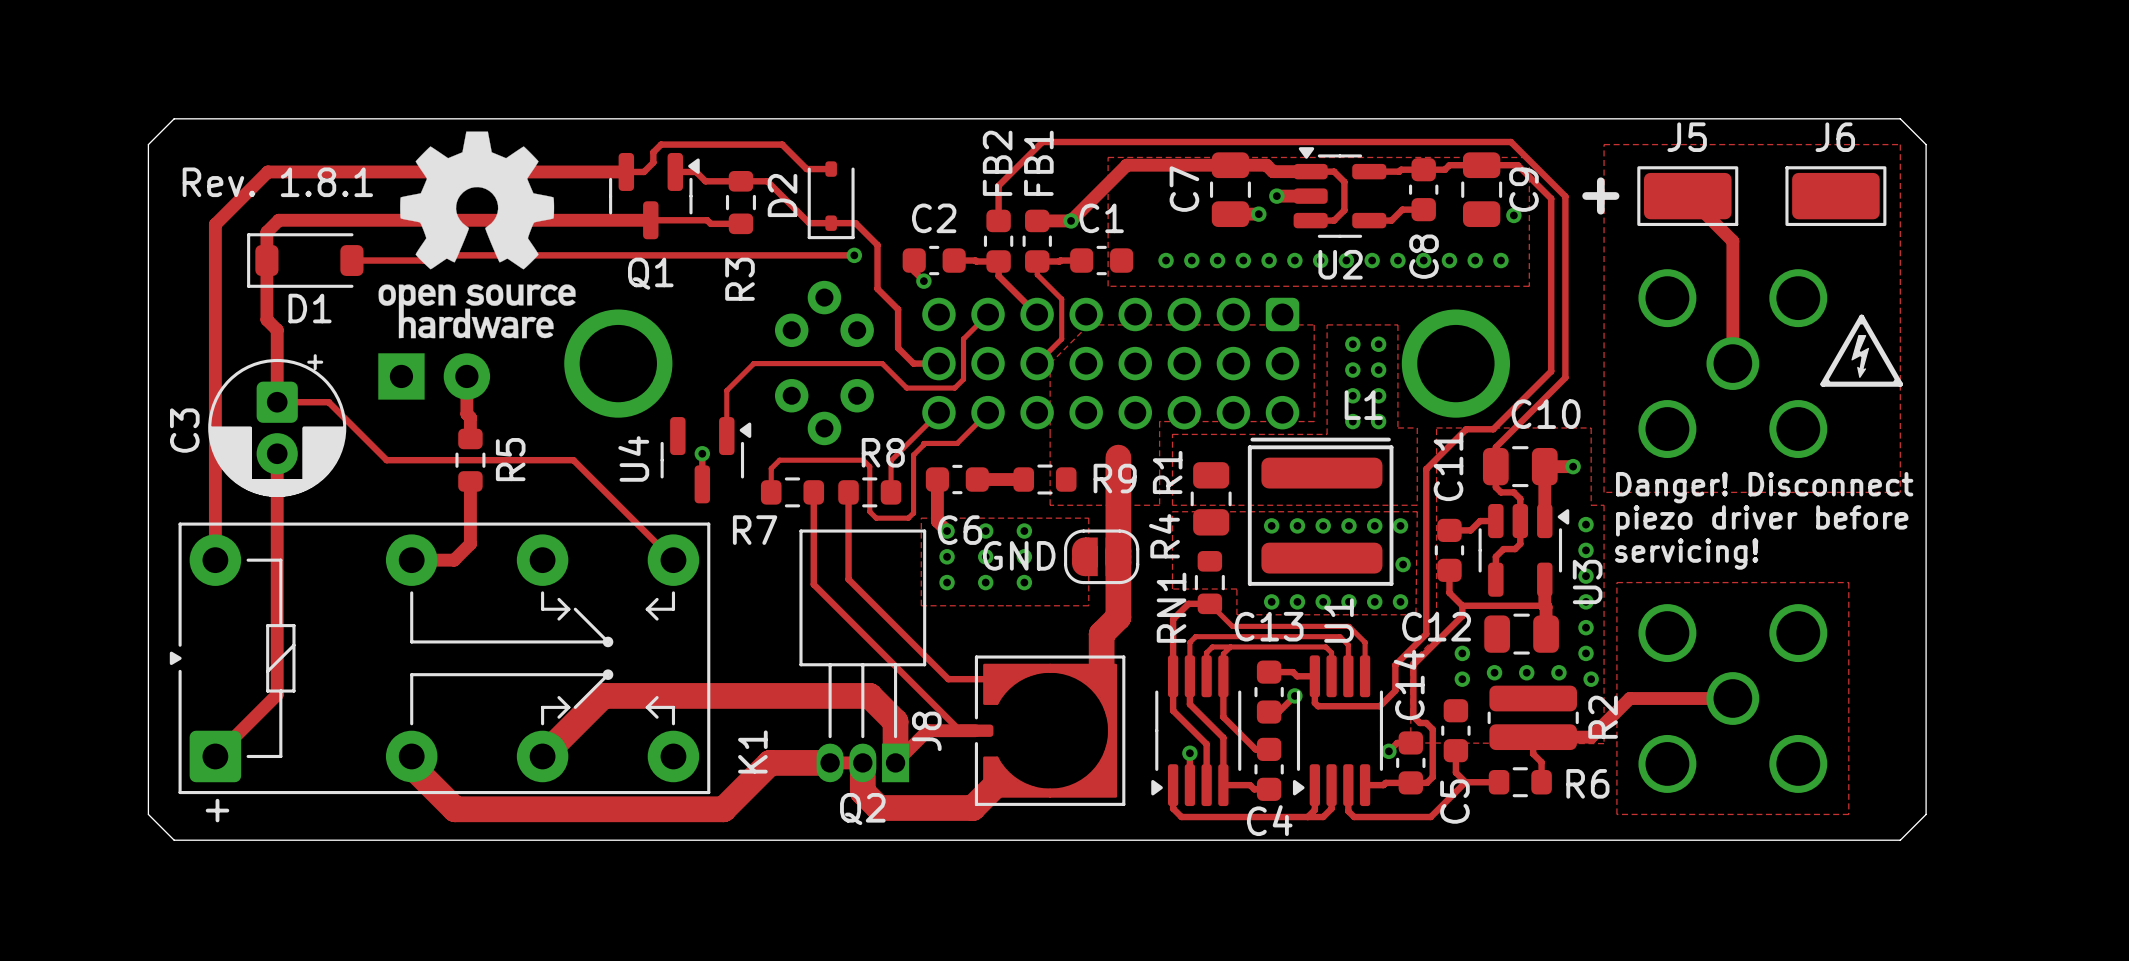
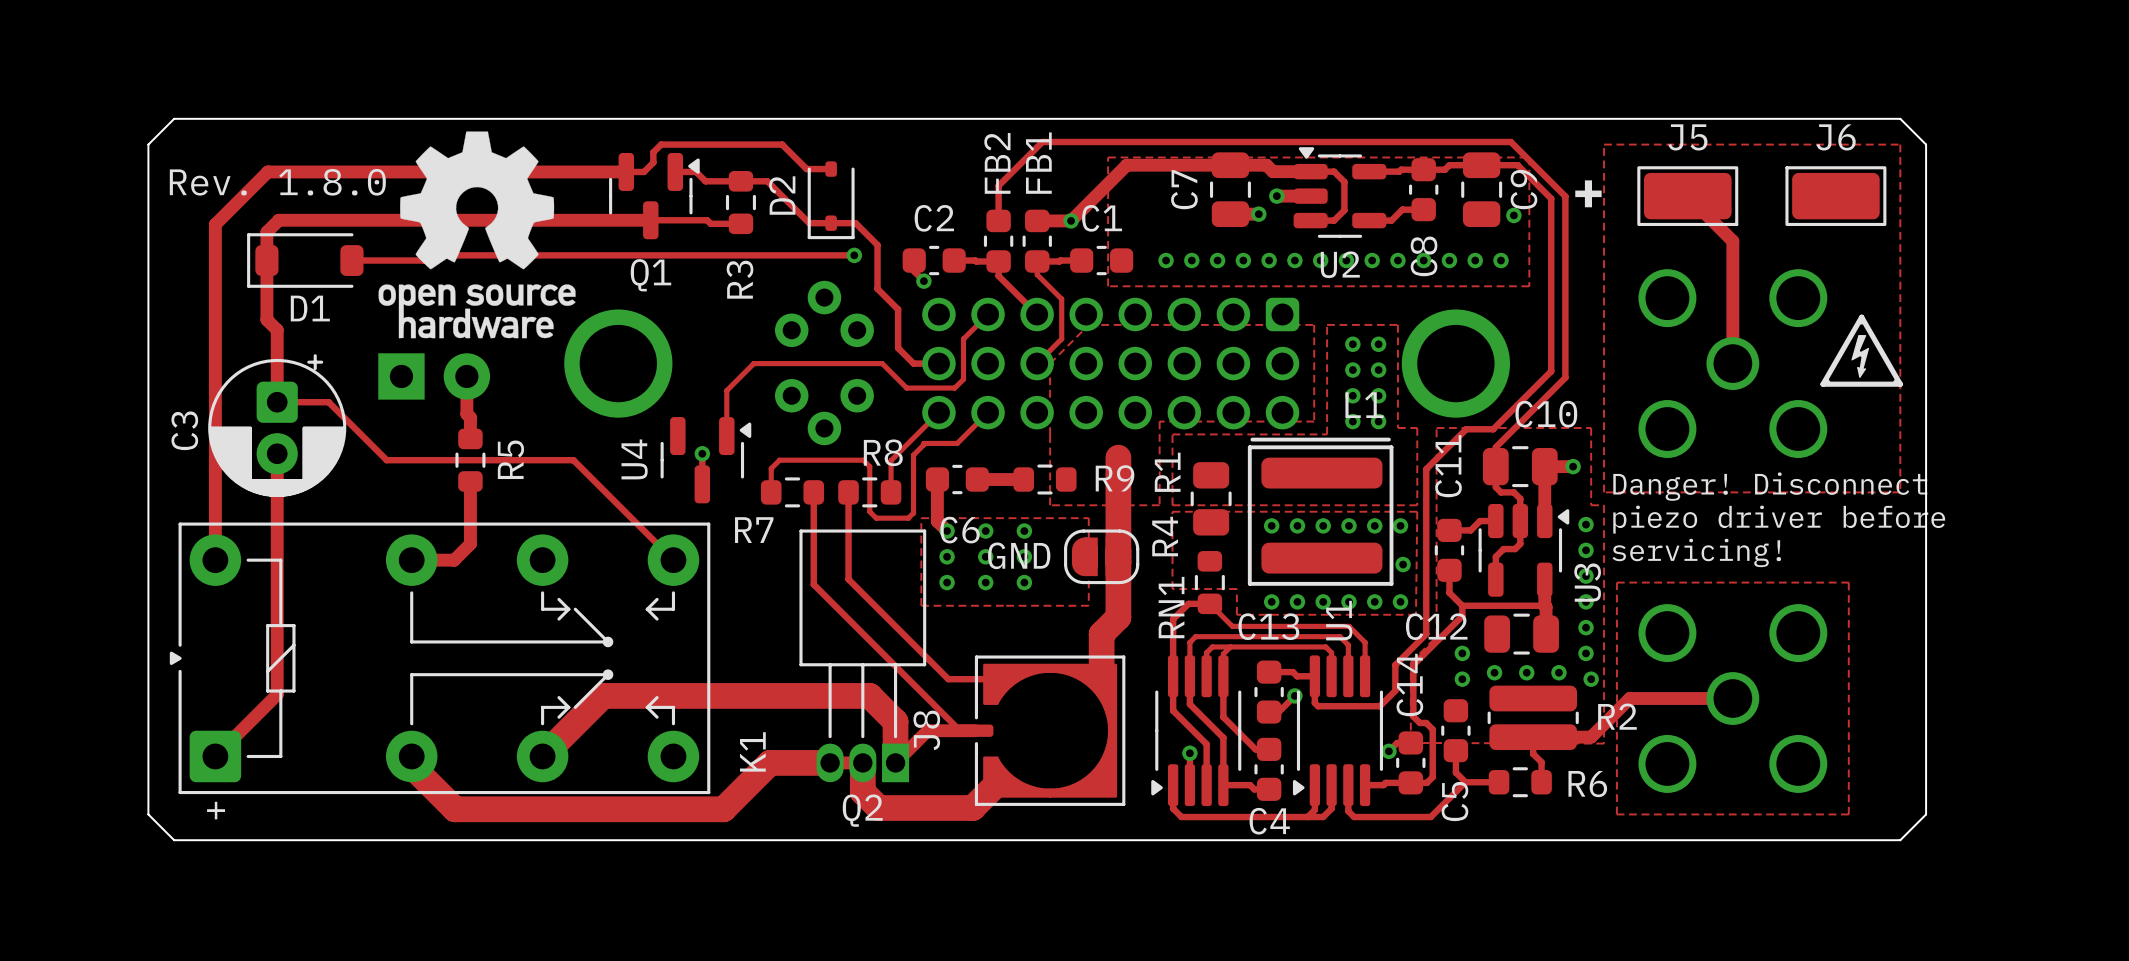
text: Rev. 1.8.1 (277, 182) -> Rev. 1.8.0 (277, 182)
R2 name rotation: 0° (1603, 717) -> 90° clockwise (1617, 716)

